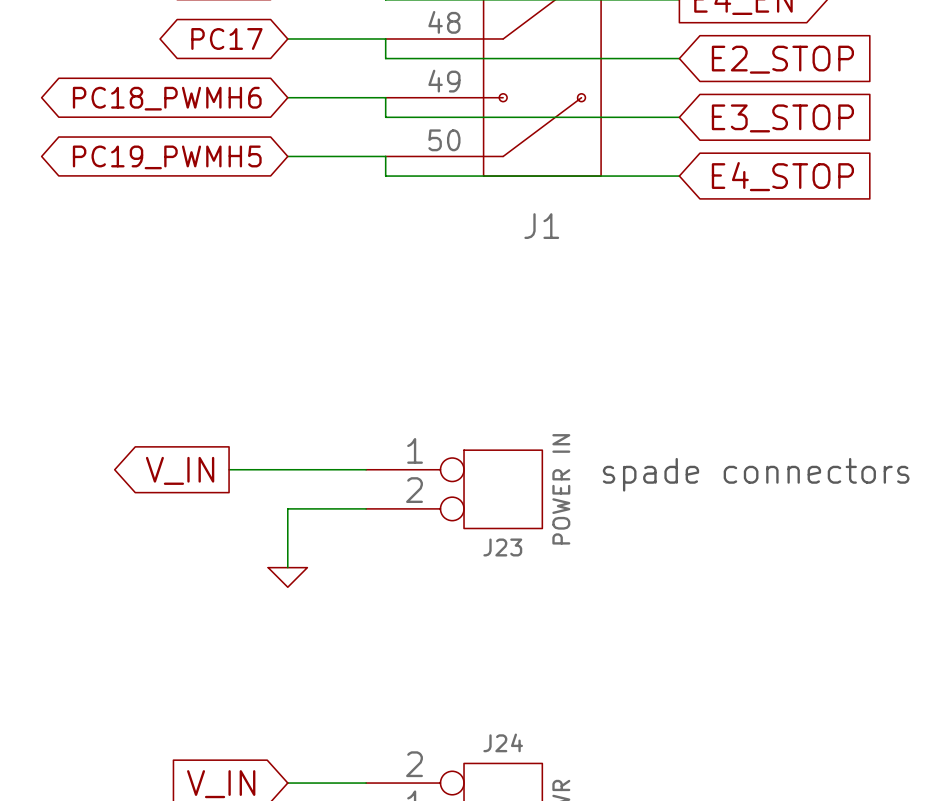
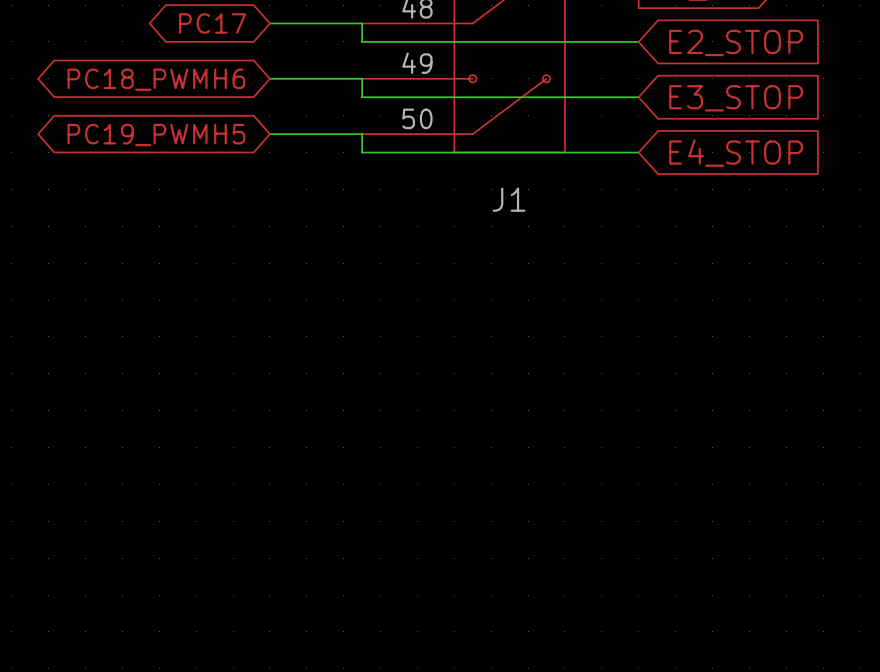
wire: (229, 469) (366, 469) -> none
global label: V_IN (180, 470) -> none
text: spade connectors (756, 474) -> none
J23: POWER IN (454, 489) -> none
wire: (366, 508) (287, 508) (287, 567) -> none
power symbol: (287, 577) -> none

